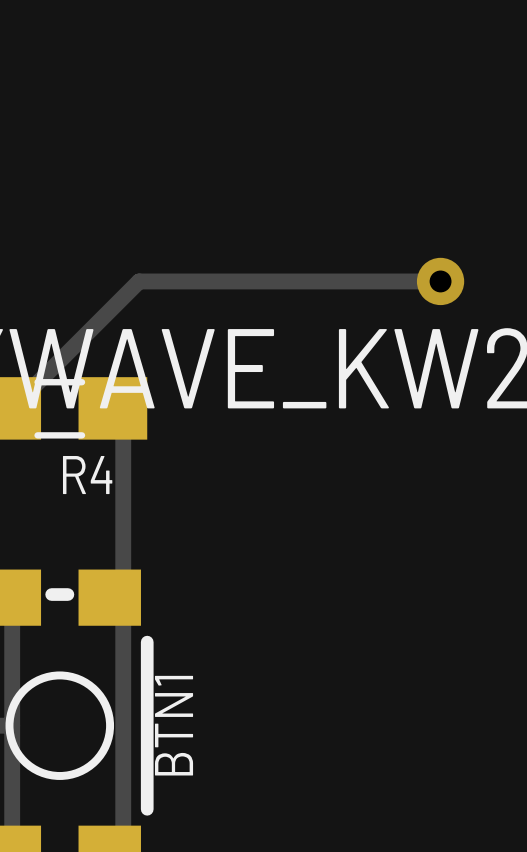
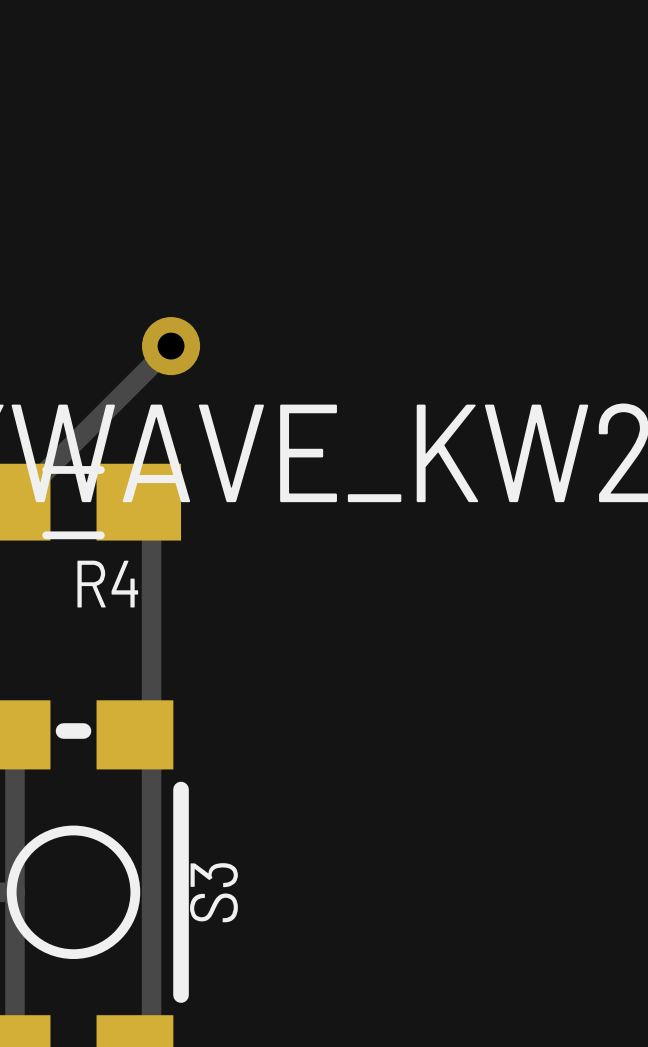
track: (139, 281) (440, 281) -> none
via position: (440, 281) -> (171, 346)
BTN1 name: BTN1 (174, 725) -> S3 (213, 892)

